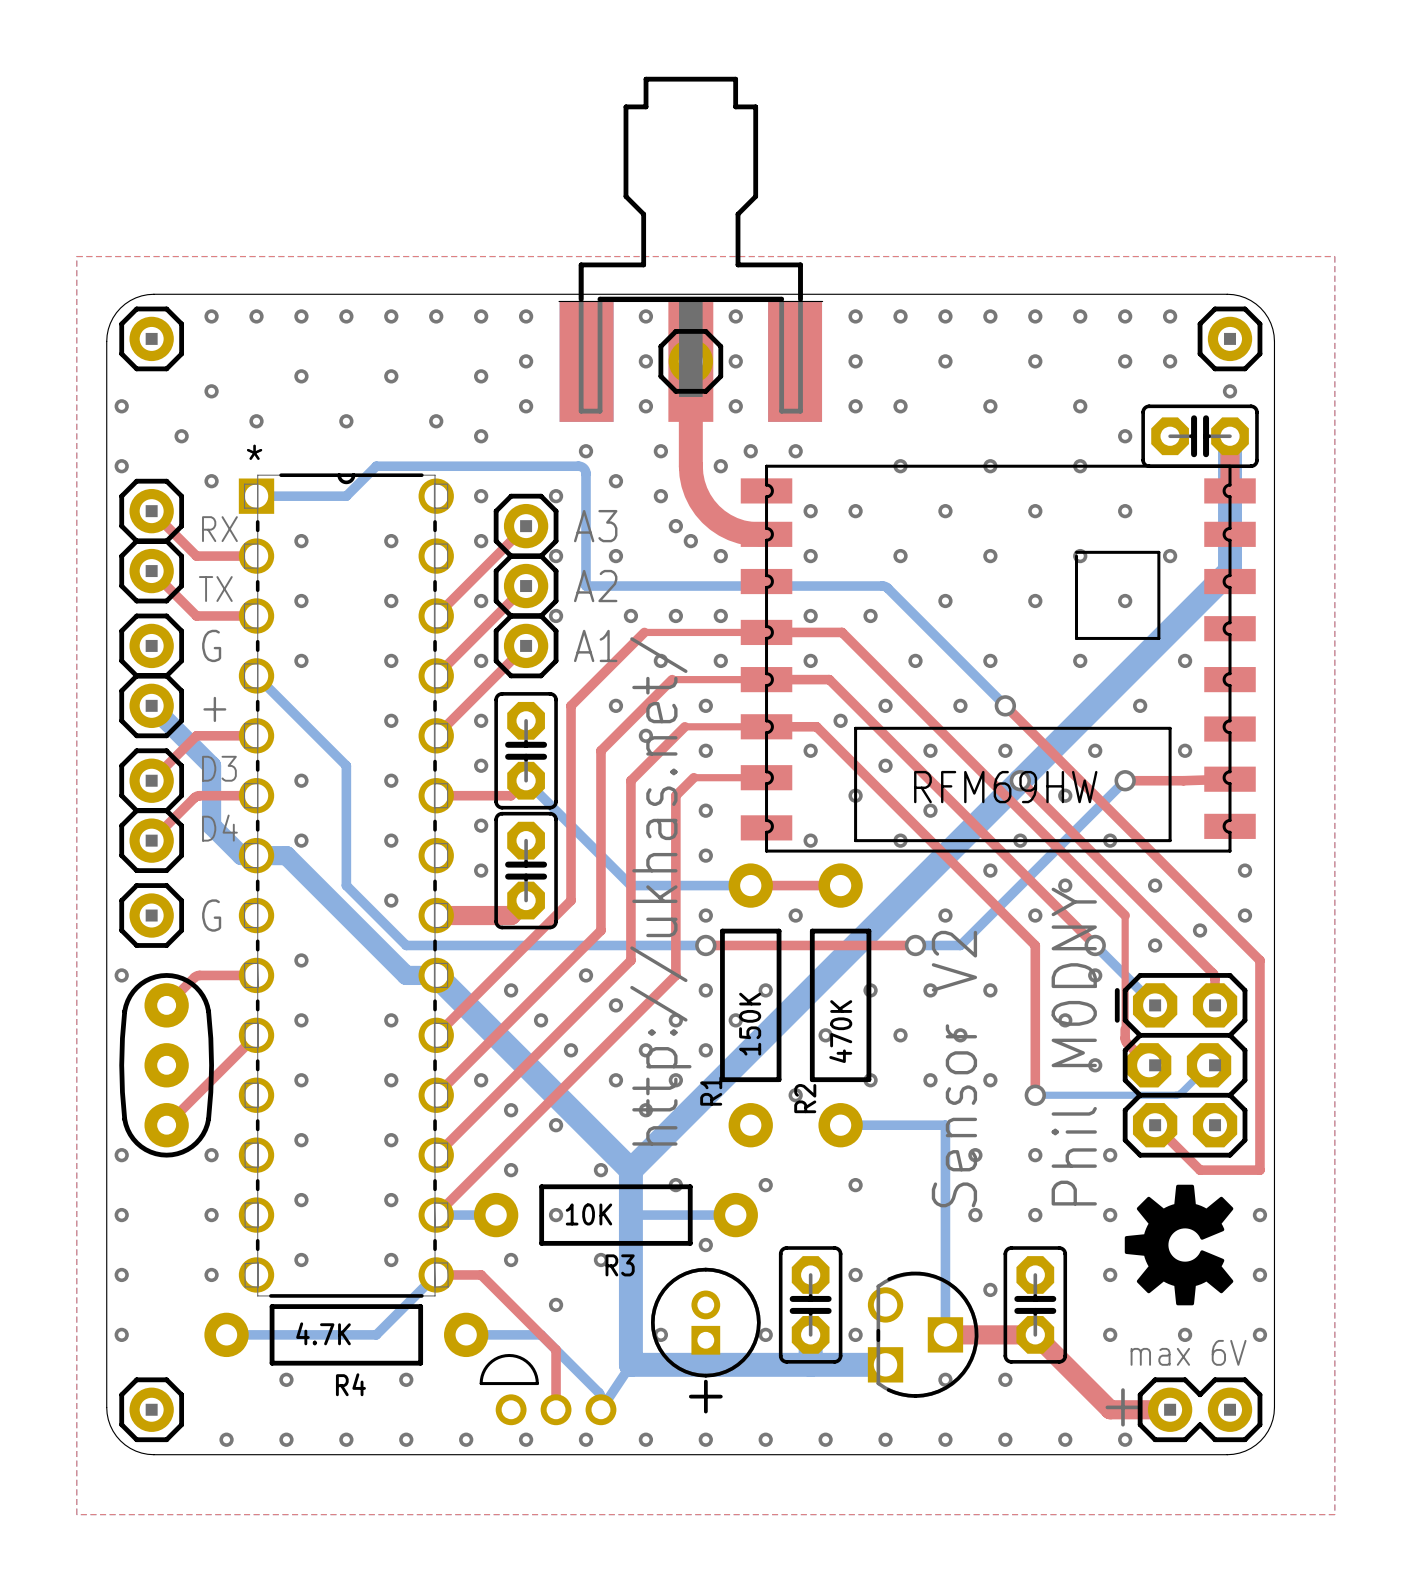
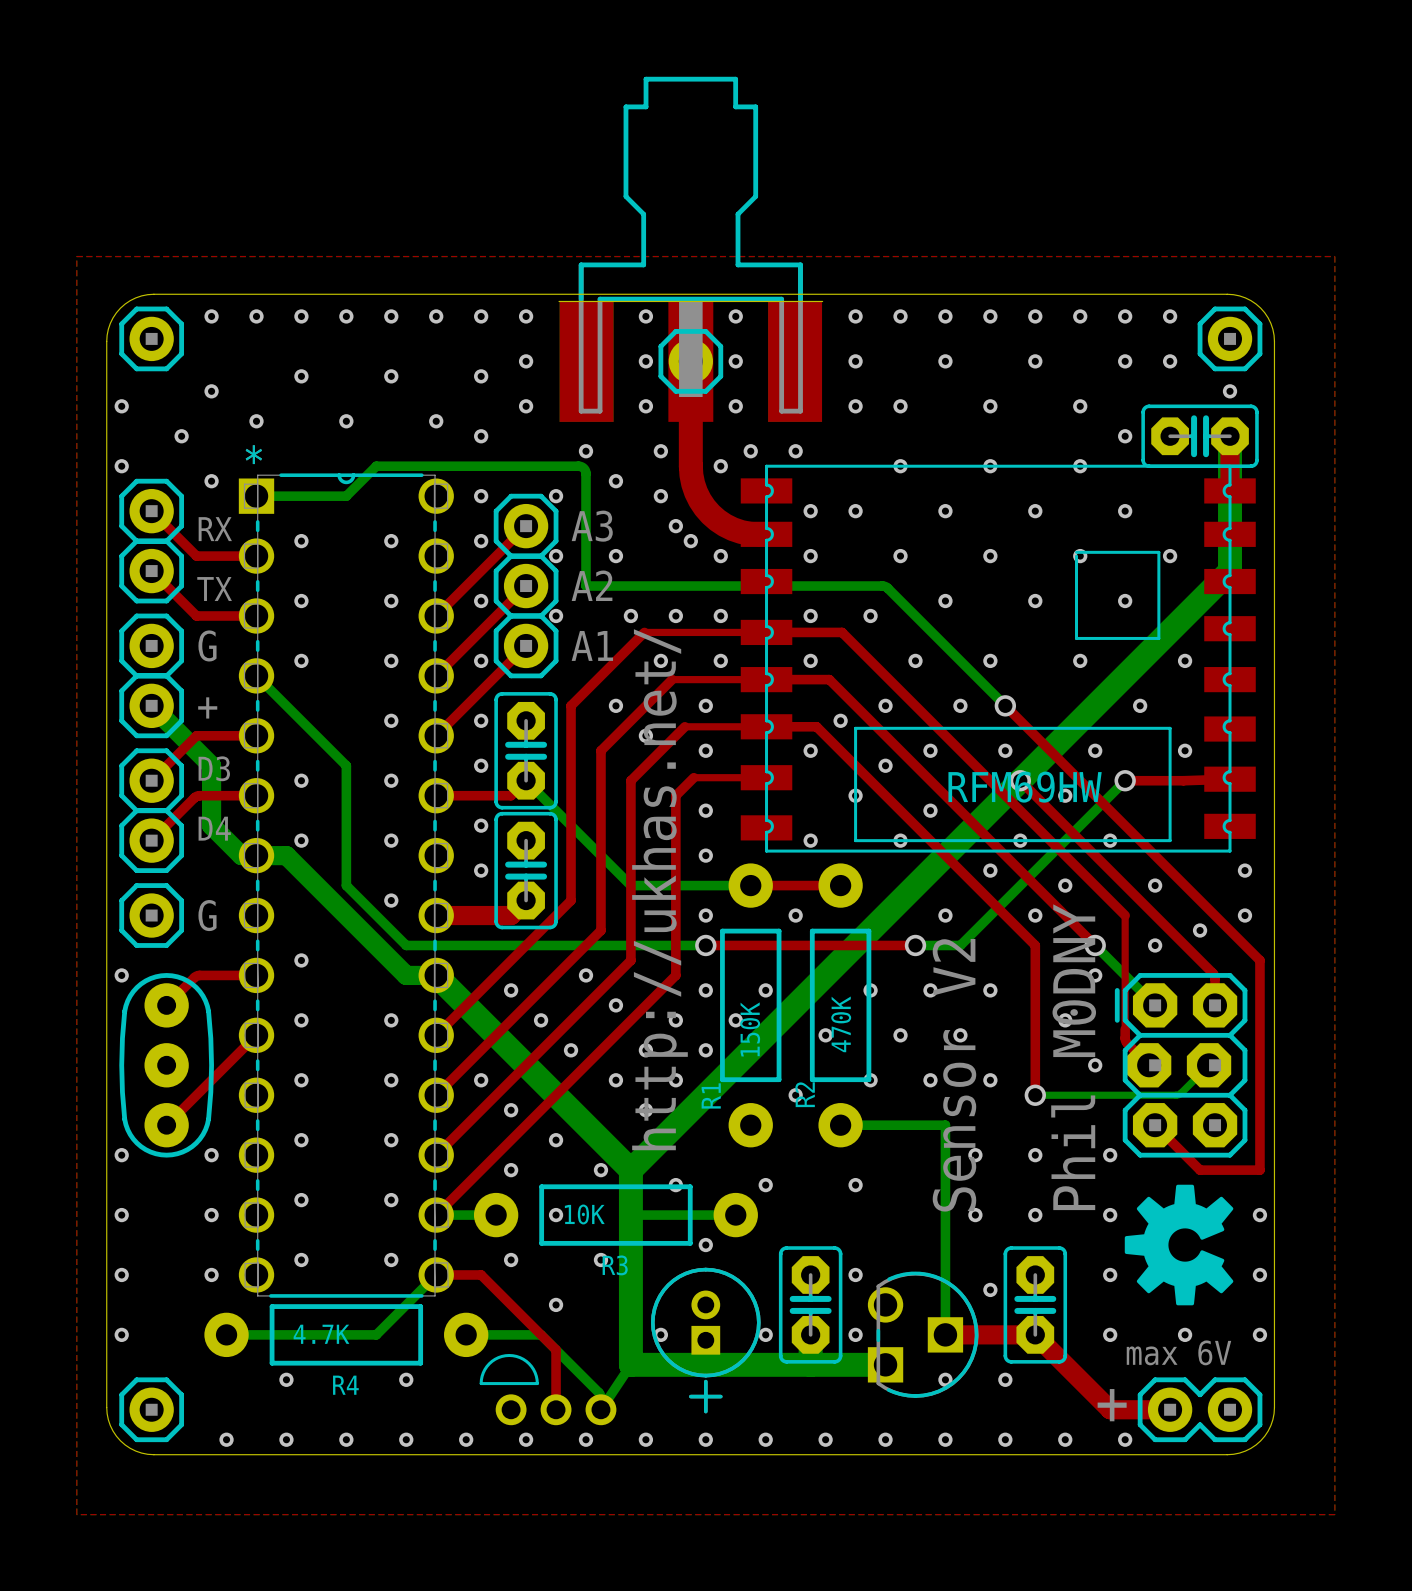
via position: (556, 1125) -> (556, 1140)

